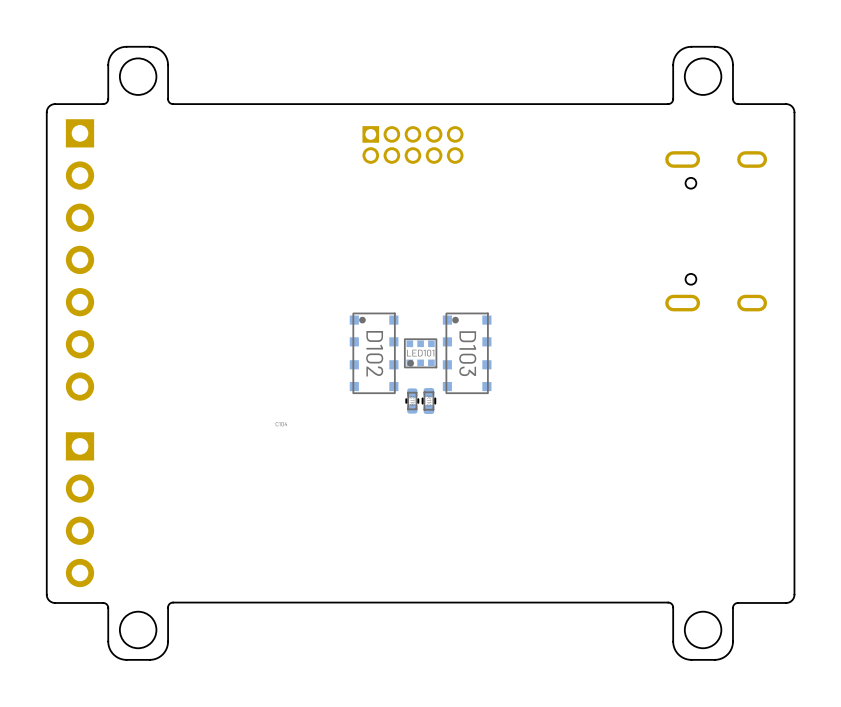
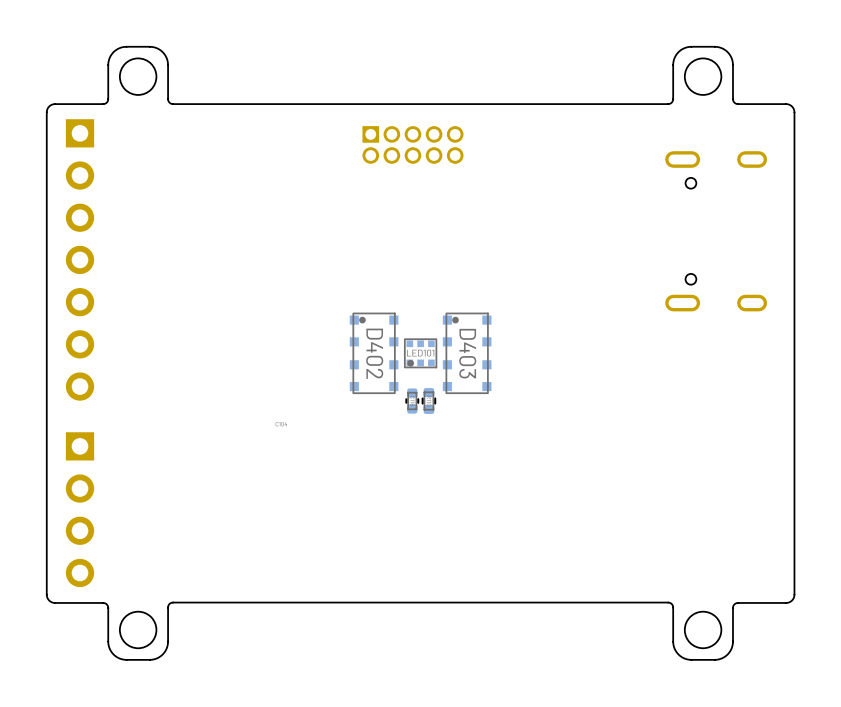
D102 name: D102 (374, 353) -> D402 (374, 353)
D103 name: D103 (467, 353) -> D403 (467, 353)

